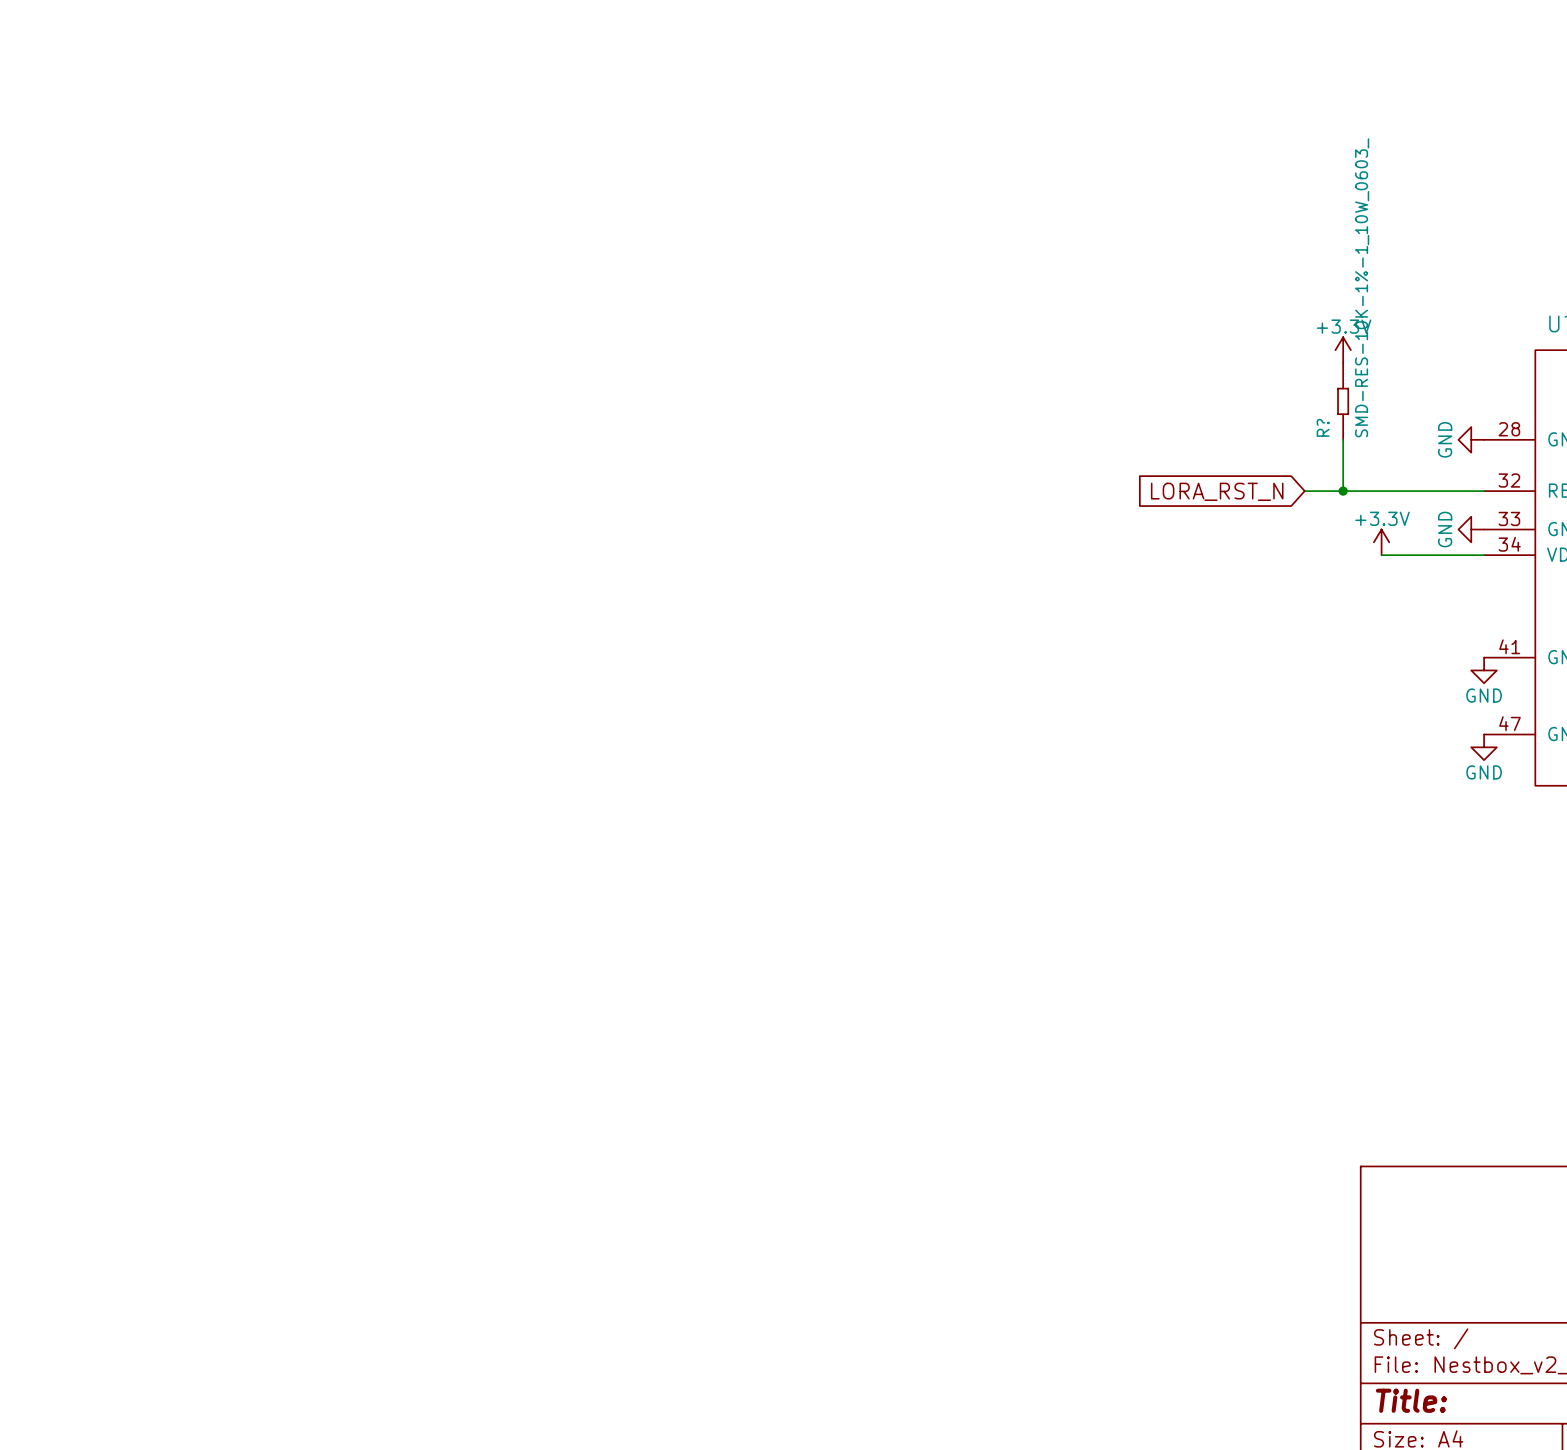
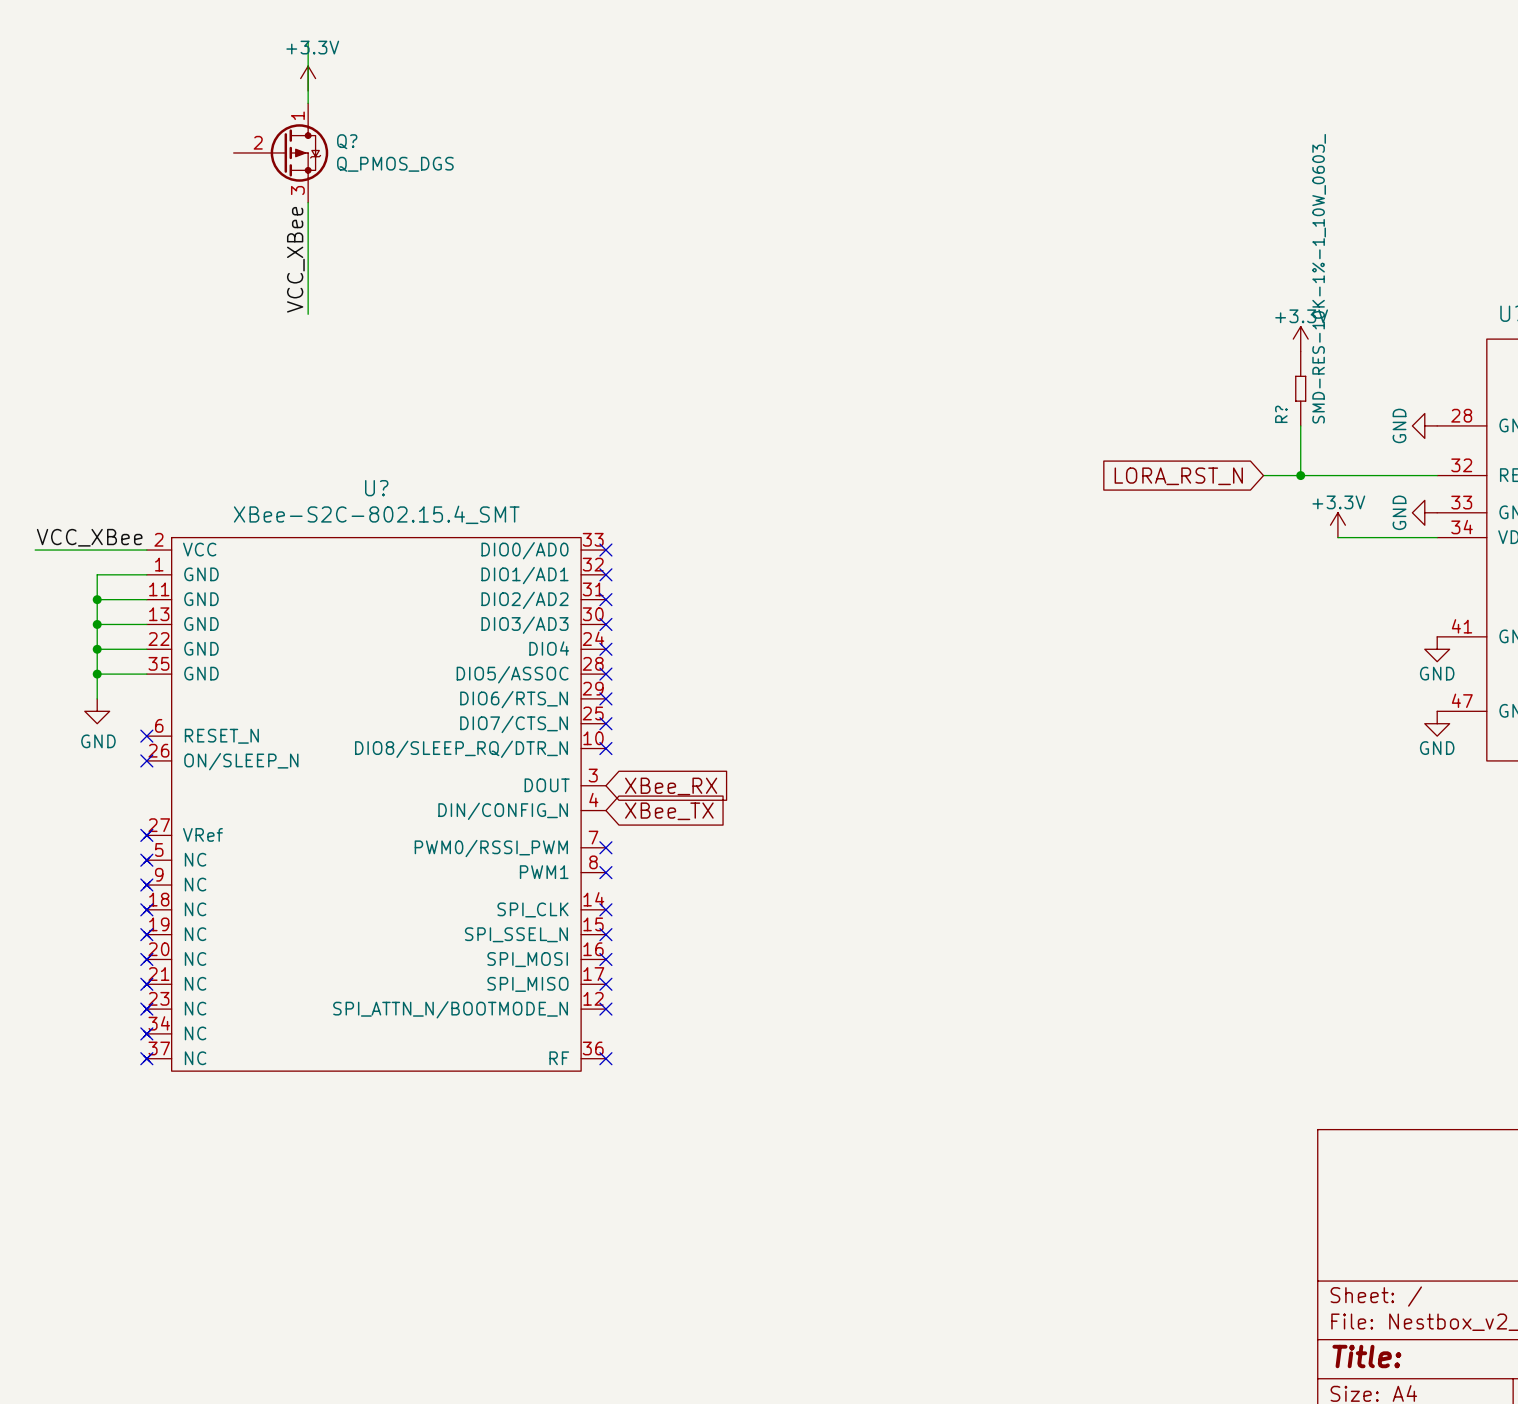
wire: none -> (308, 41) (308, 103)
power symbol: none -> +3.3V (308, 78)
Q?: none -> Q_PMOS_DGS (280, 152)
wire: none -> (308, 202) (308, 314)
label: none -> VCC_XBee (295, 259)
label: none -> VCC_XBee (89, 537)
wire: none -> (35, 550) (146, 550)
no-connect mark: none -> (605, 550)
wire: none -> (146, 574) (97, 574) (97, 698)
no-connect mark: none -> (605, 574)
wire: none -> (97, 599) (146, 599)
junction: none -> (97, 599)
no-connect mark: none -> (605, 599)
wire: none -> (97, 624) (146, 624)
junction: none -> (97, 624)
no-connect mark: none -> (605, 624)
wire: none -> (97, 649) (146, 649)
junction: none -> (97, 649)
no-connect mark: none -> (605, 649)
wire: none -> (97, 674) (146, 674)
junction: none -> (97, 674)
no-connect mark: none -> (605, 674)
no-connect mark: none -> (605, 698)
power symbol: none -> GND (97, 711)
no-connect mark: none -> (605, 723)
no-connect mark: none -> (146, 736)
no-connect mark: none -> (605, 748)
no-connect mark: none -> (146, 760)
global label: none -> XBee_RX (671, 786)
U?: none -> XBee-S2C-802.15.4_SMT (374, 804)
global label: none -> XBee_TX (669, 811)
no-connect mark: none -> (146, 835)
no-connect mark: none -> (605, 847)
no-connect mark: none -> (146, 860)
no-connect mark: none -> (605, 872)
no-connect mark: none -> (146, 885)
no-connect mark: none -> (146, 909)
no-connect mark: none -> (605, 909)
no-connect mark: none -> (146, 934)
no-connect mark: none -> (605, 934)
no-connect mark: none -> (146, 959)
no-connect mark: none -> (605, 959)
no-connect mark: none -> (146, 984)
no-connect mark: none -> (605, 984)
no-connect mark: none -> (146, 1009)
no-connect mark: none -> (605, 1009)
no-connect mark: none -> (146, 1033)
no-connect mark: none -> (146, 1058)
no-connect mark: none -> (605, 1058)

